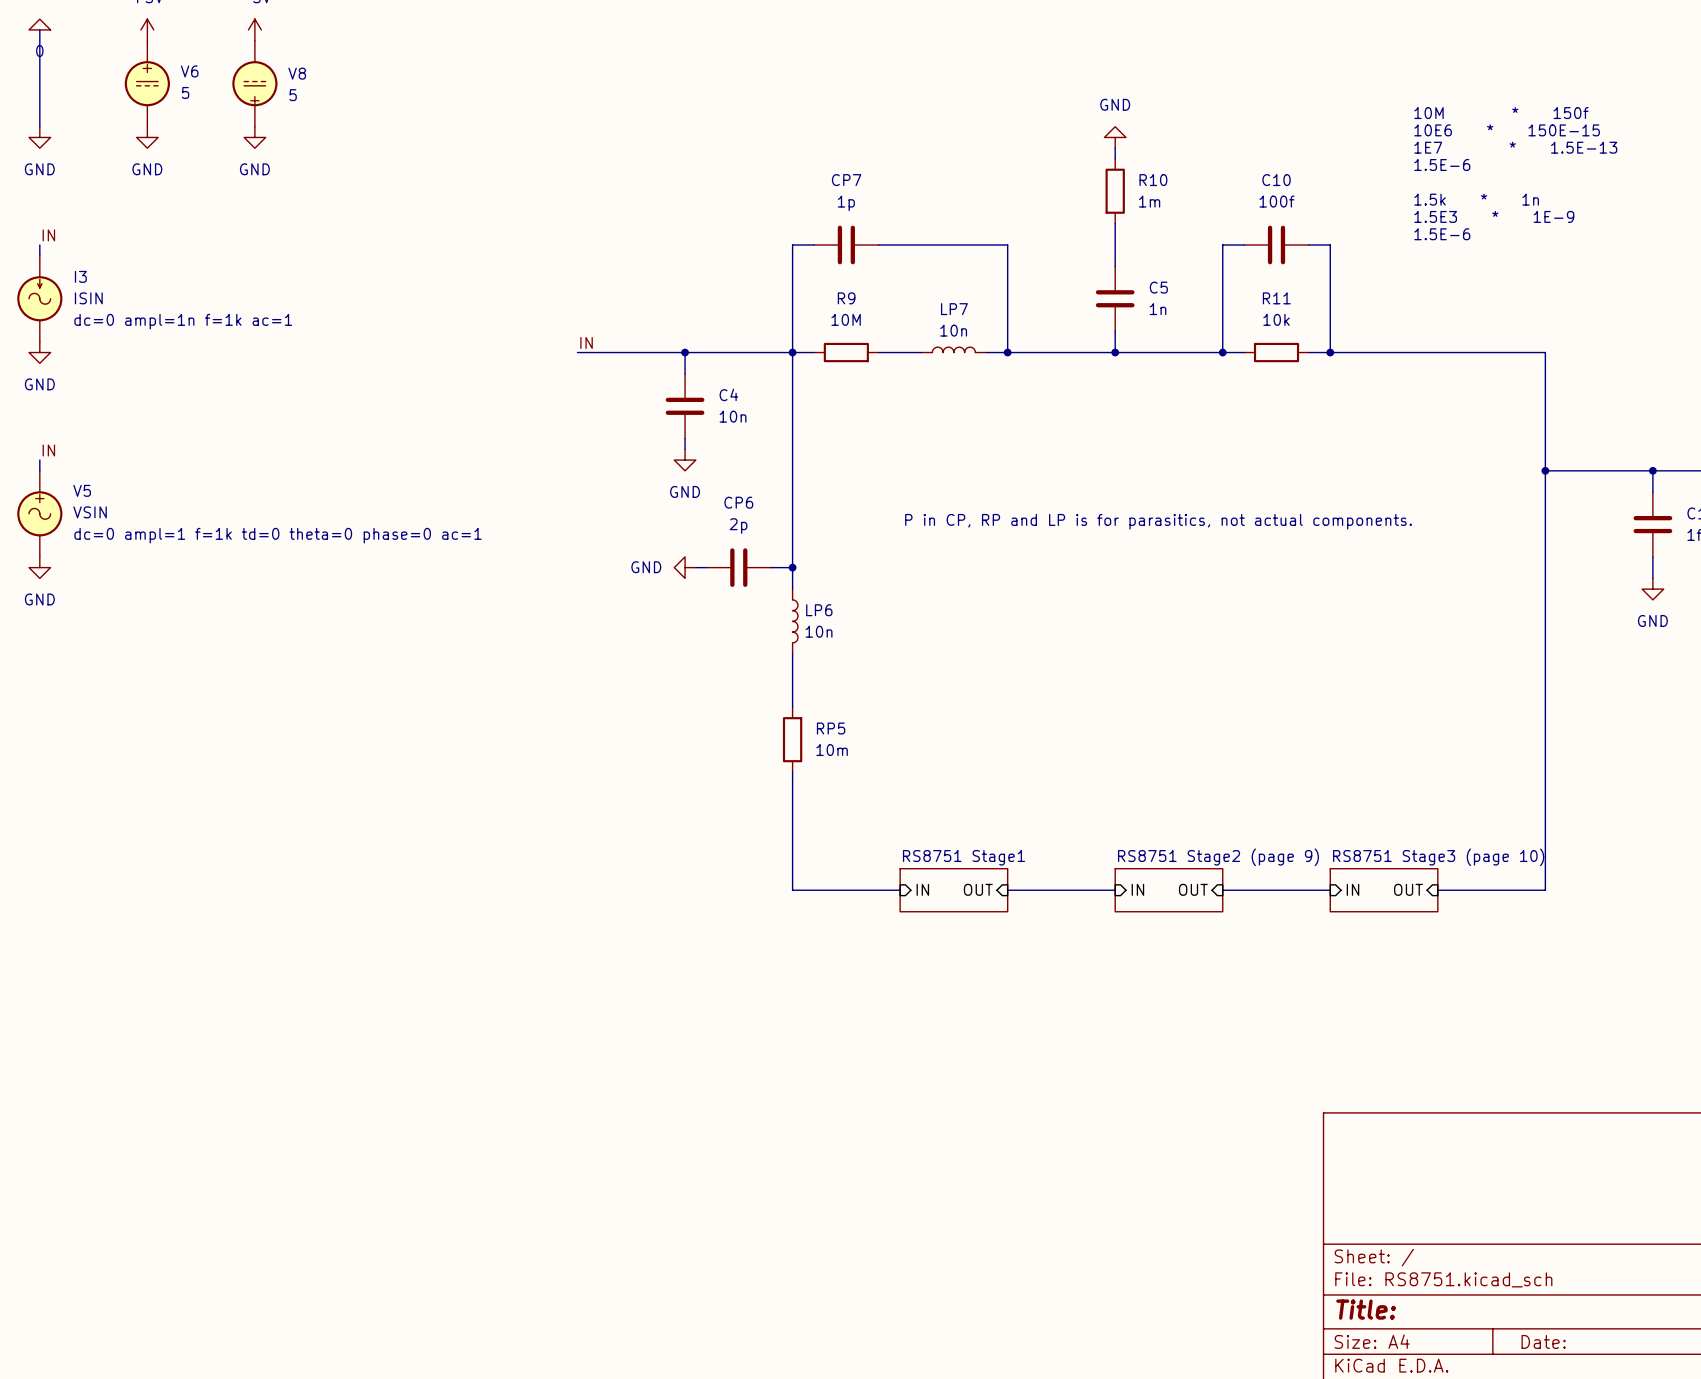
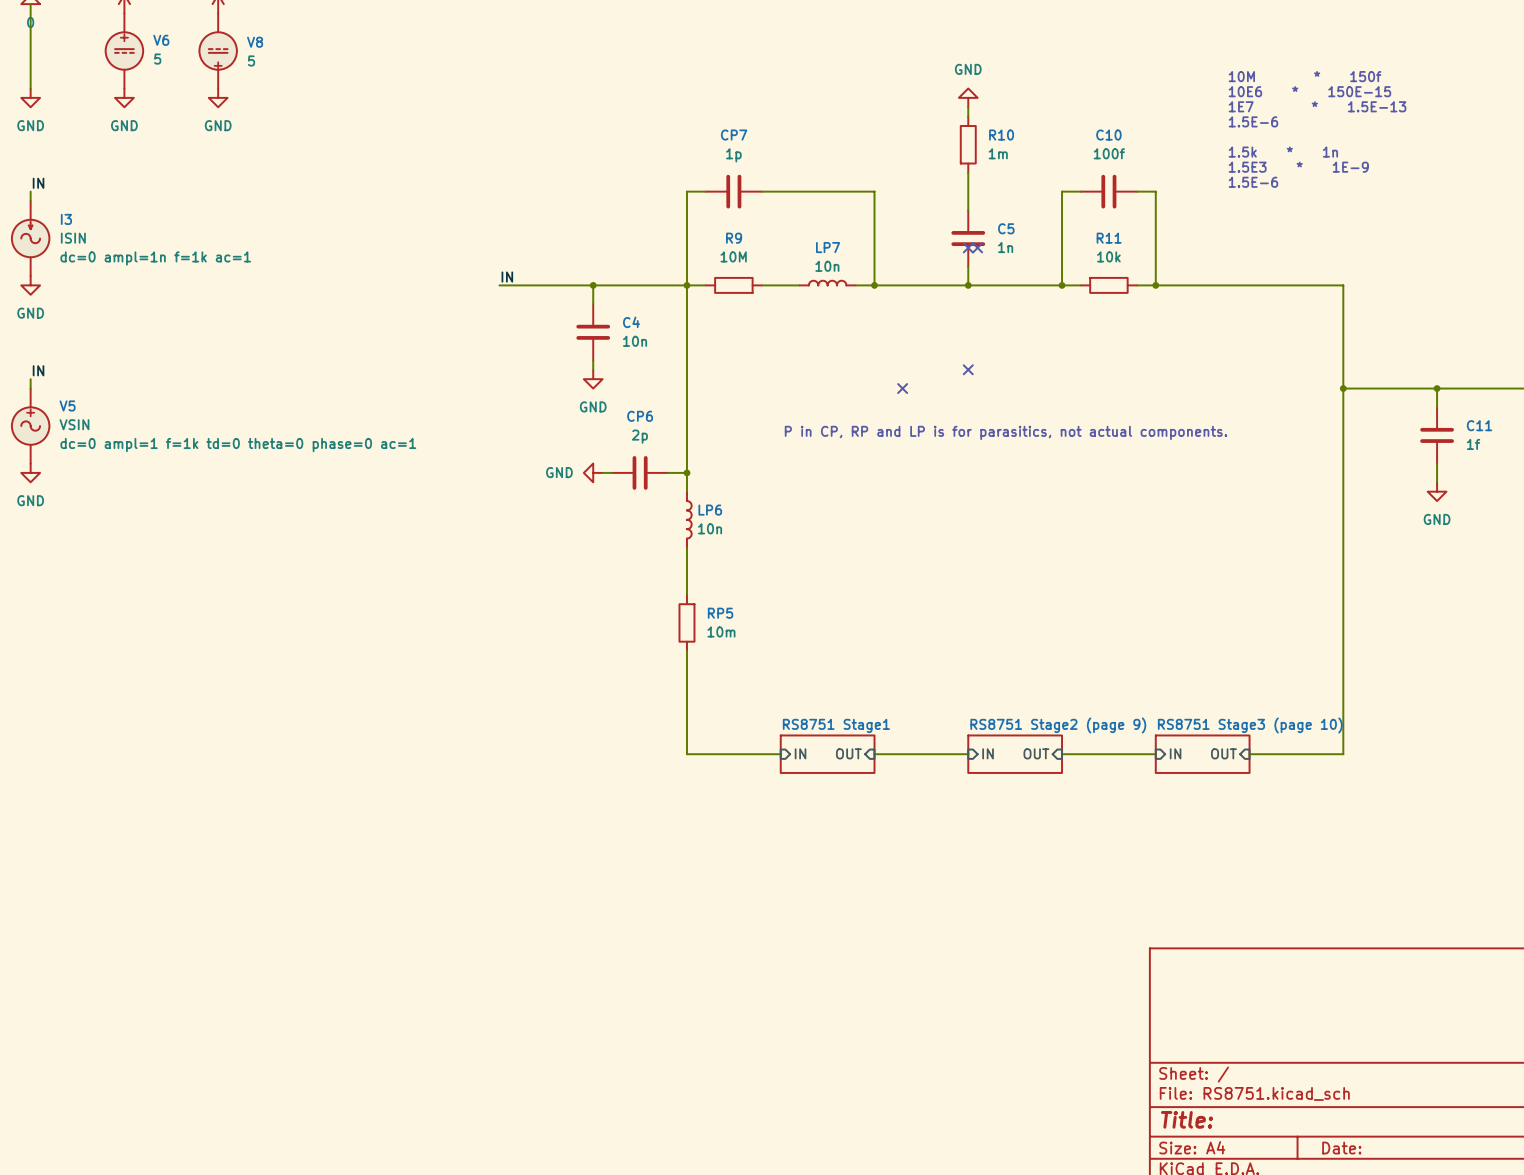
no-connect mark: none -> (968, 247)
no-connect mark: none -> (977, 247)
no-connect mark: none -> (968, 369)
no-connect mark: none -> (902, 388)

